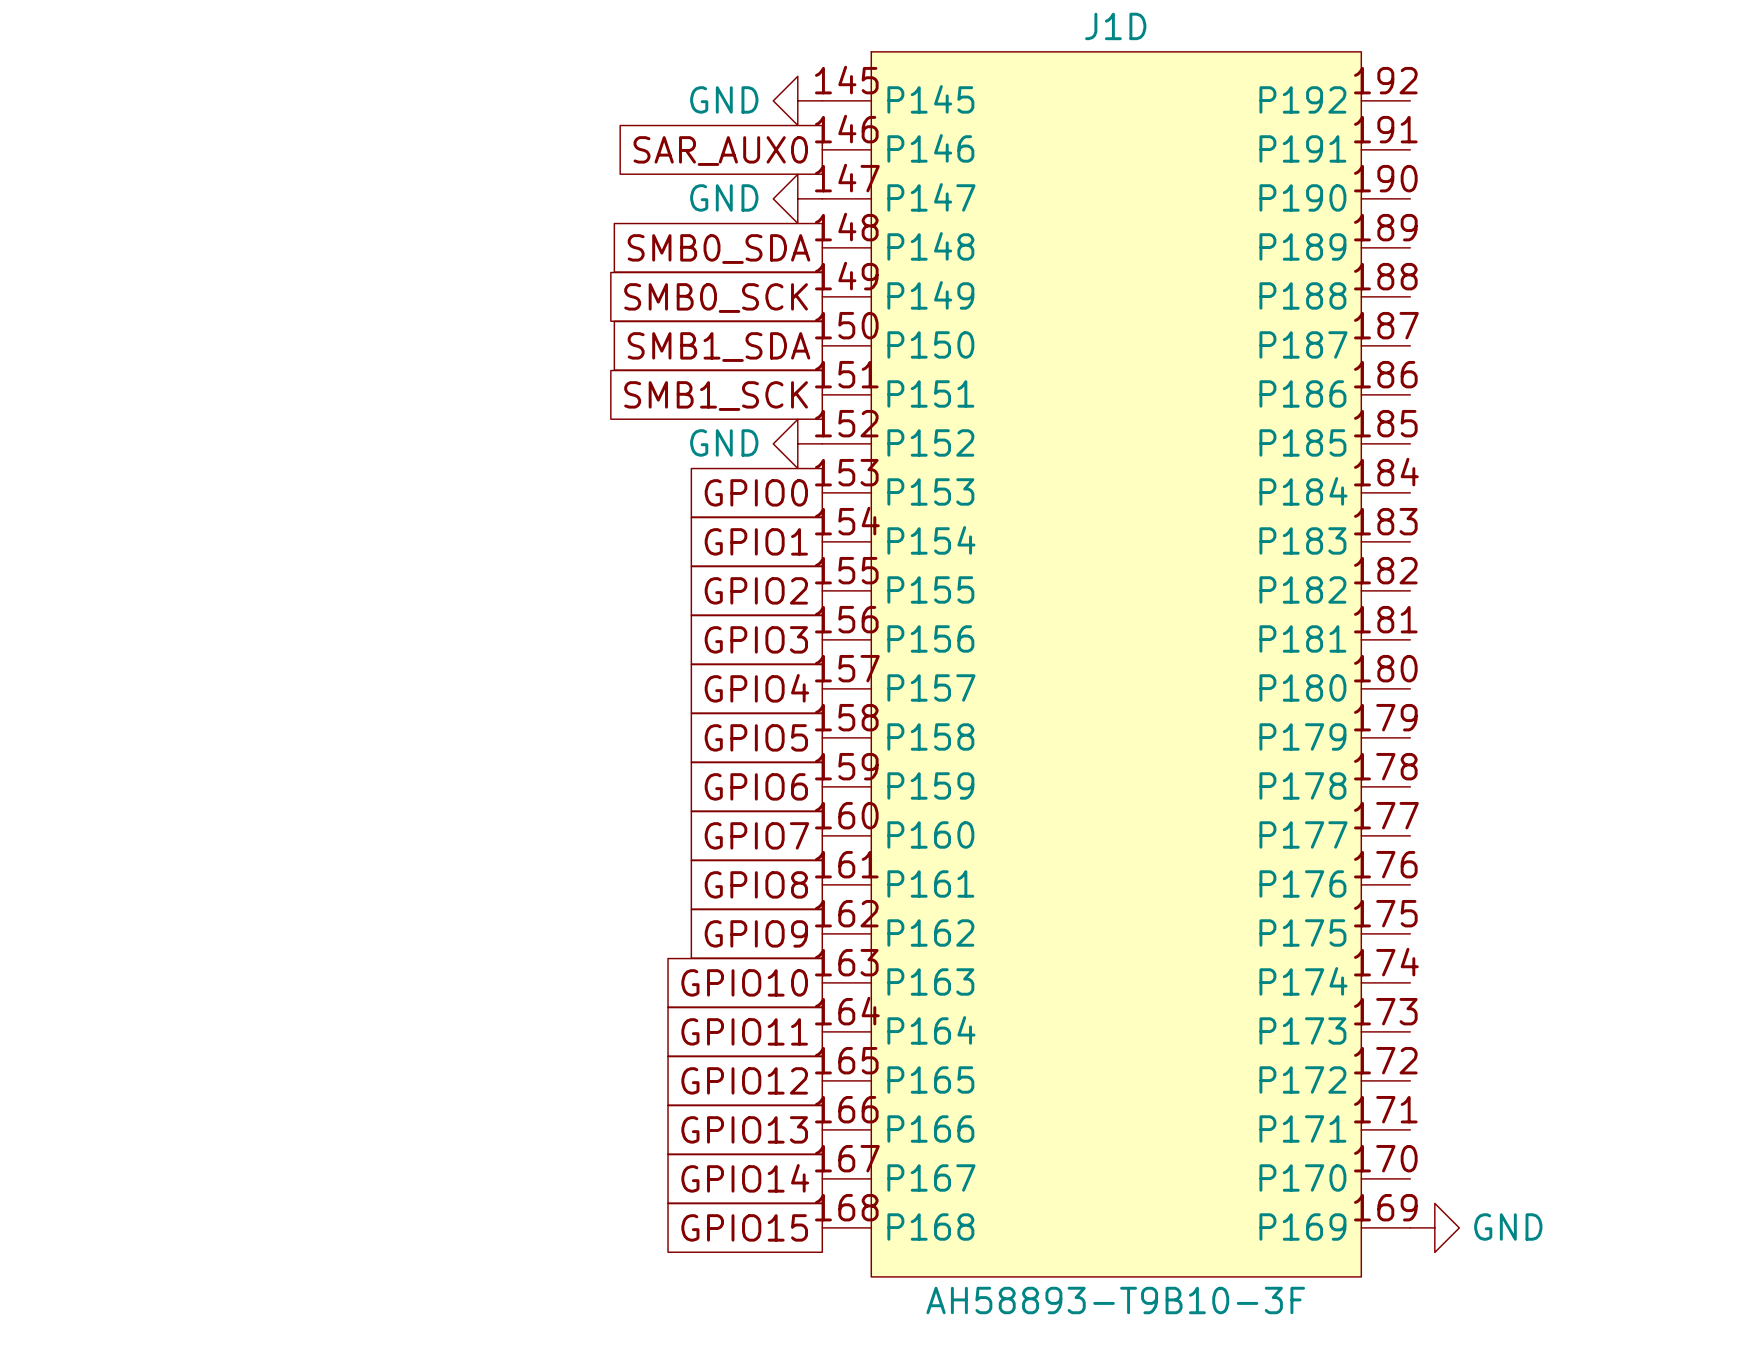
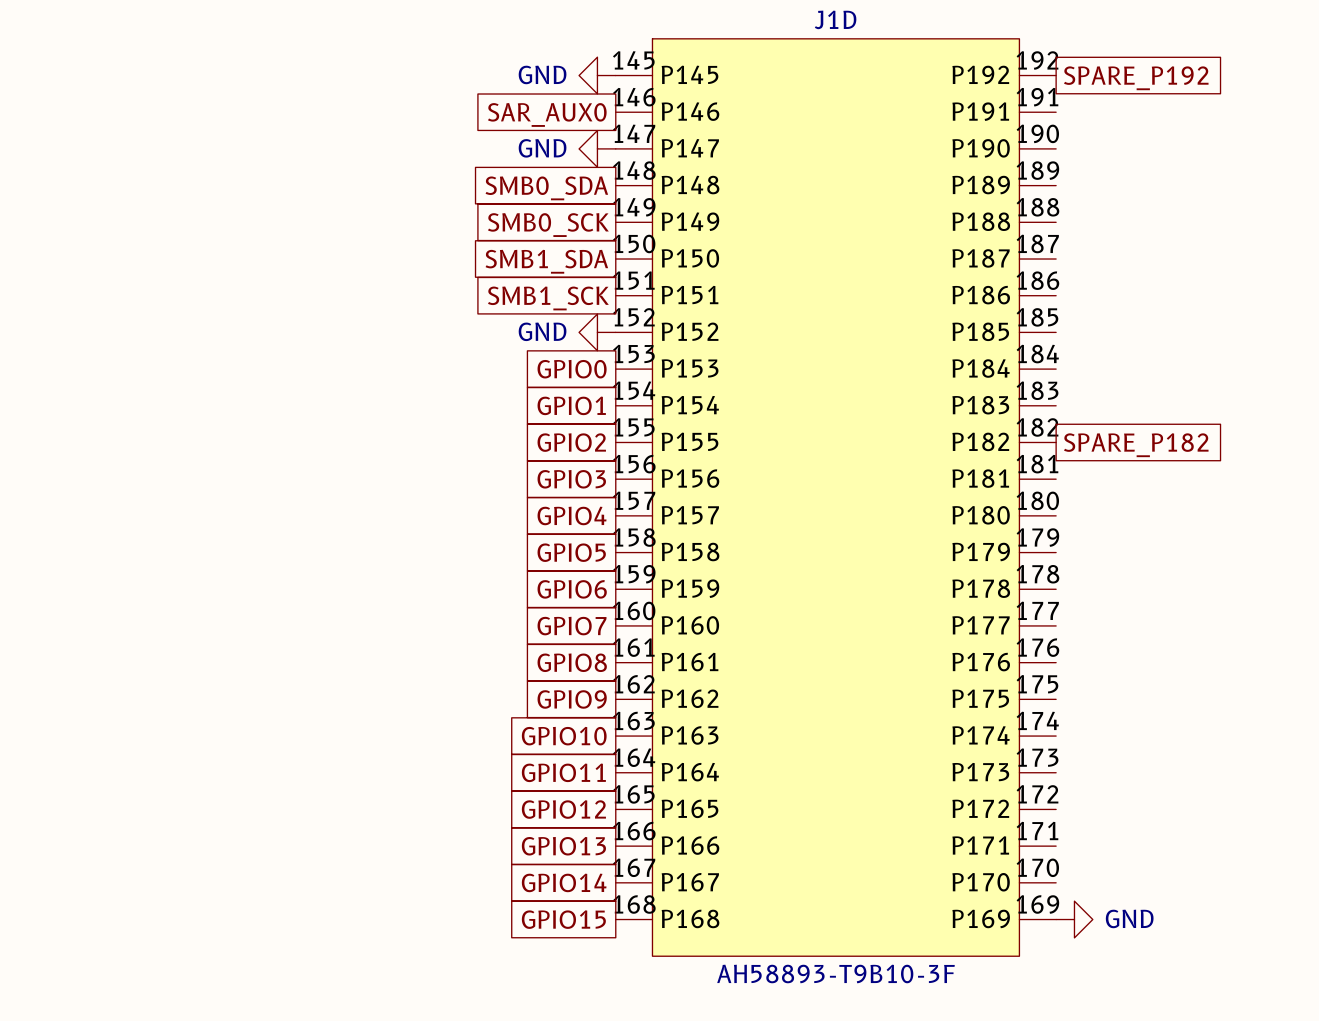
global label: none -> SPARE_P192 (1136, 78)
global label: none -> SPARE_P182 (1136, 445)

